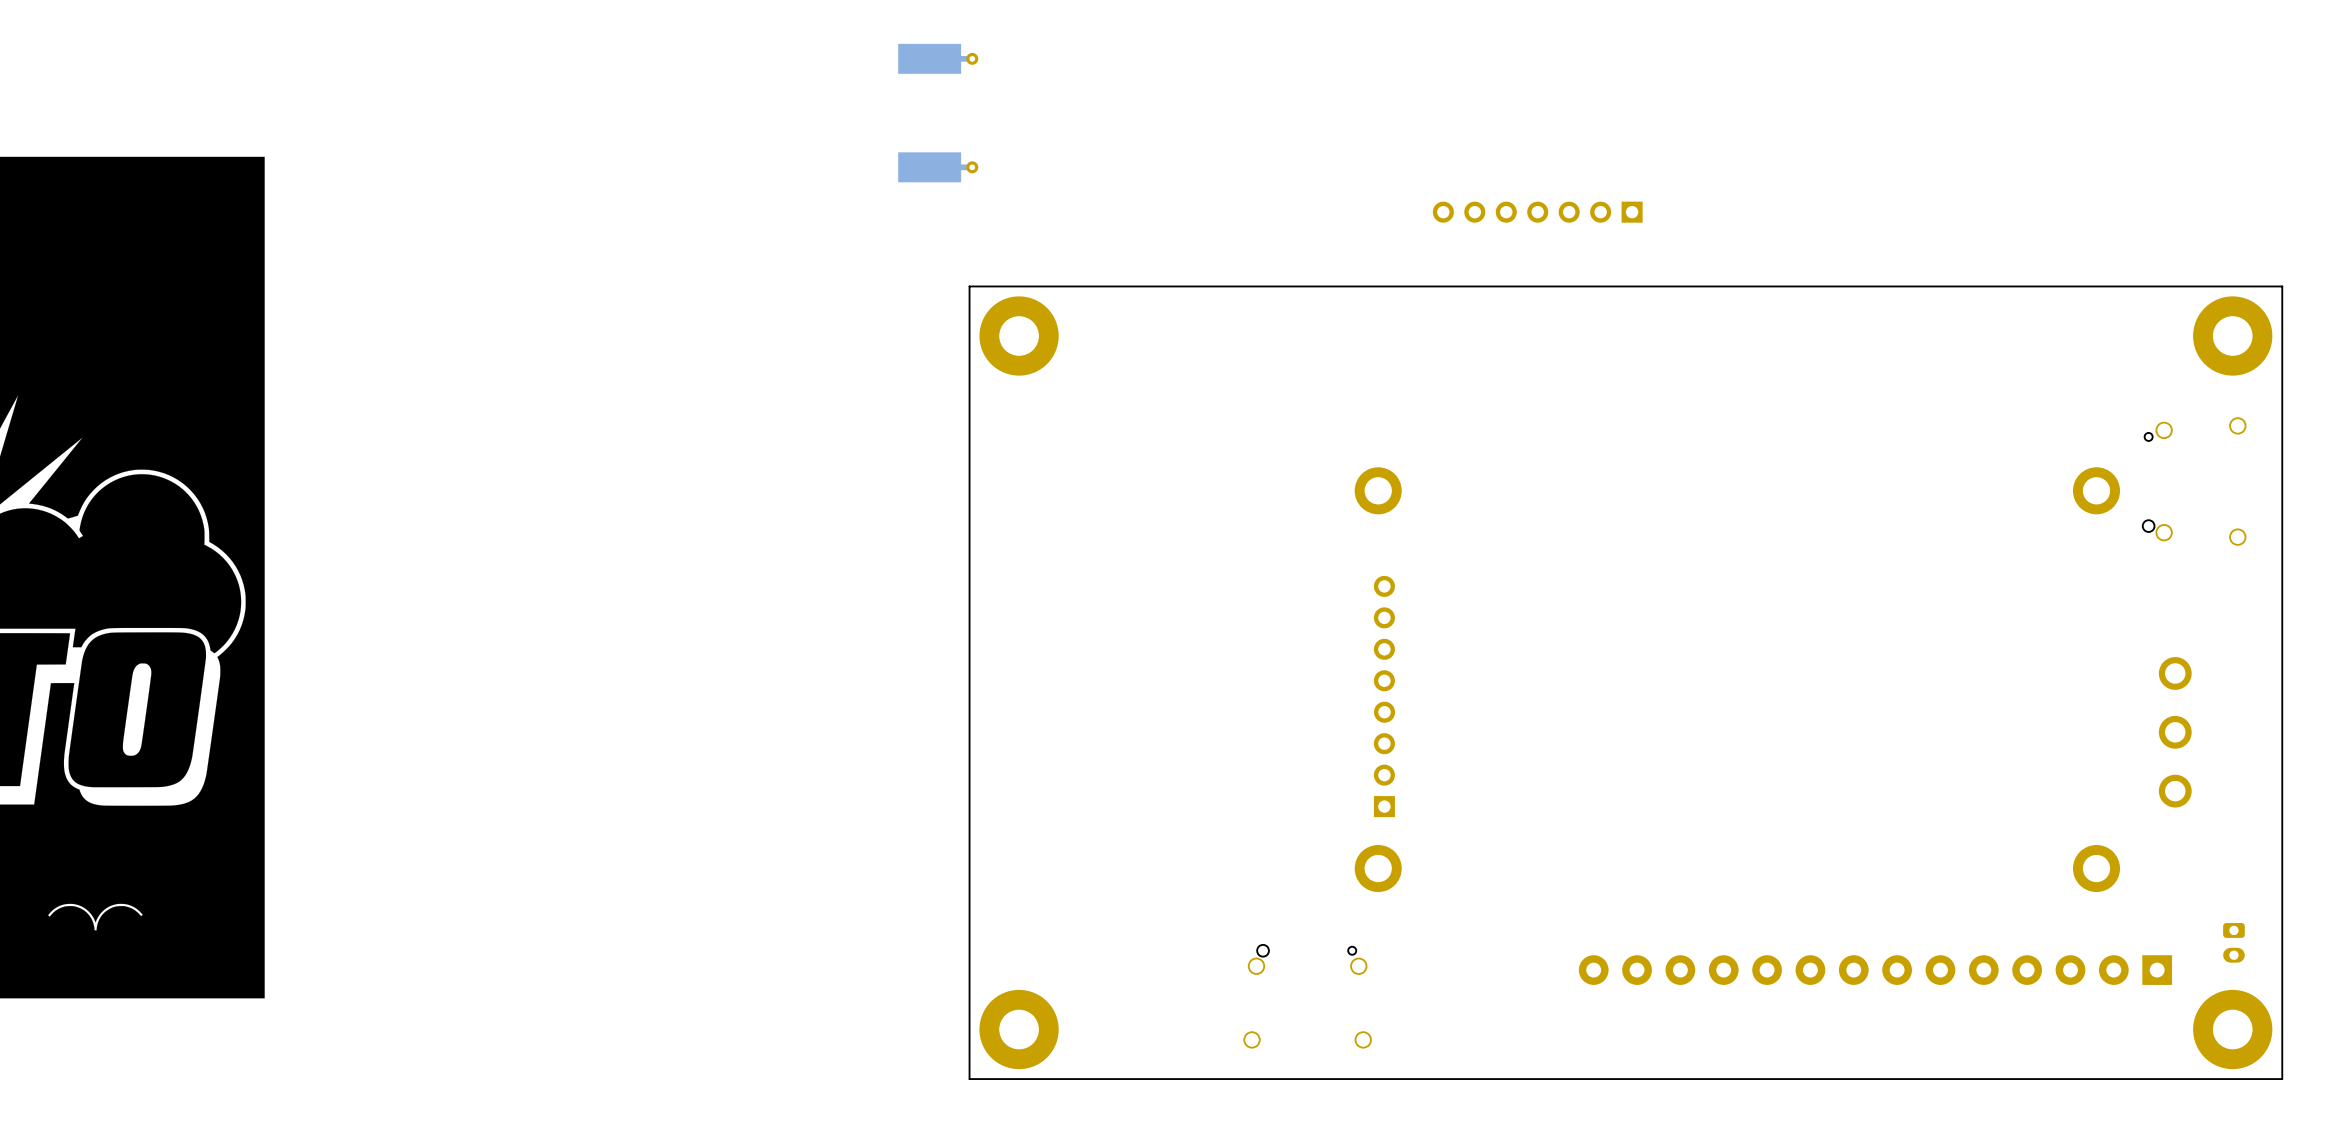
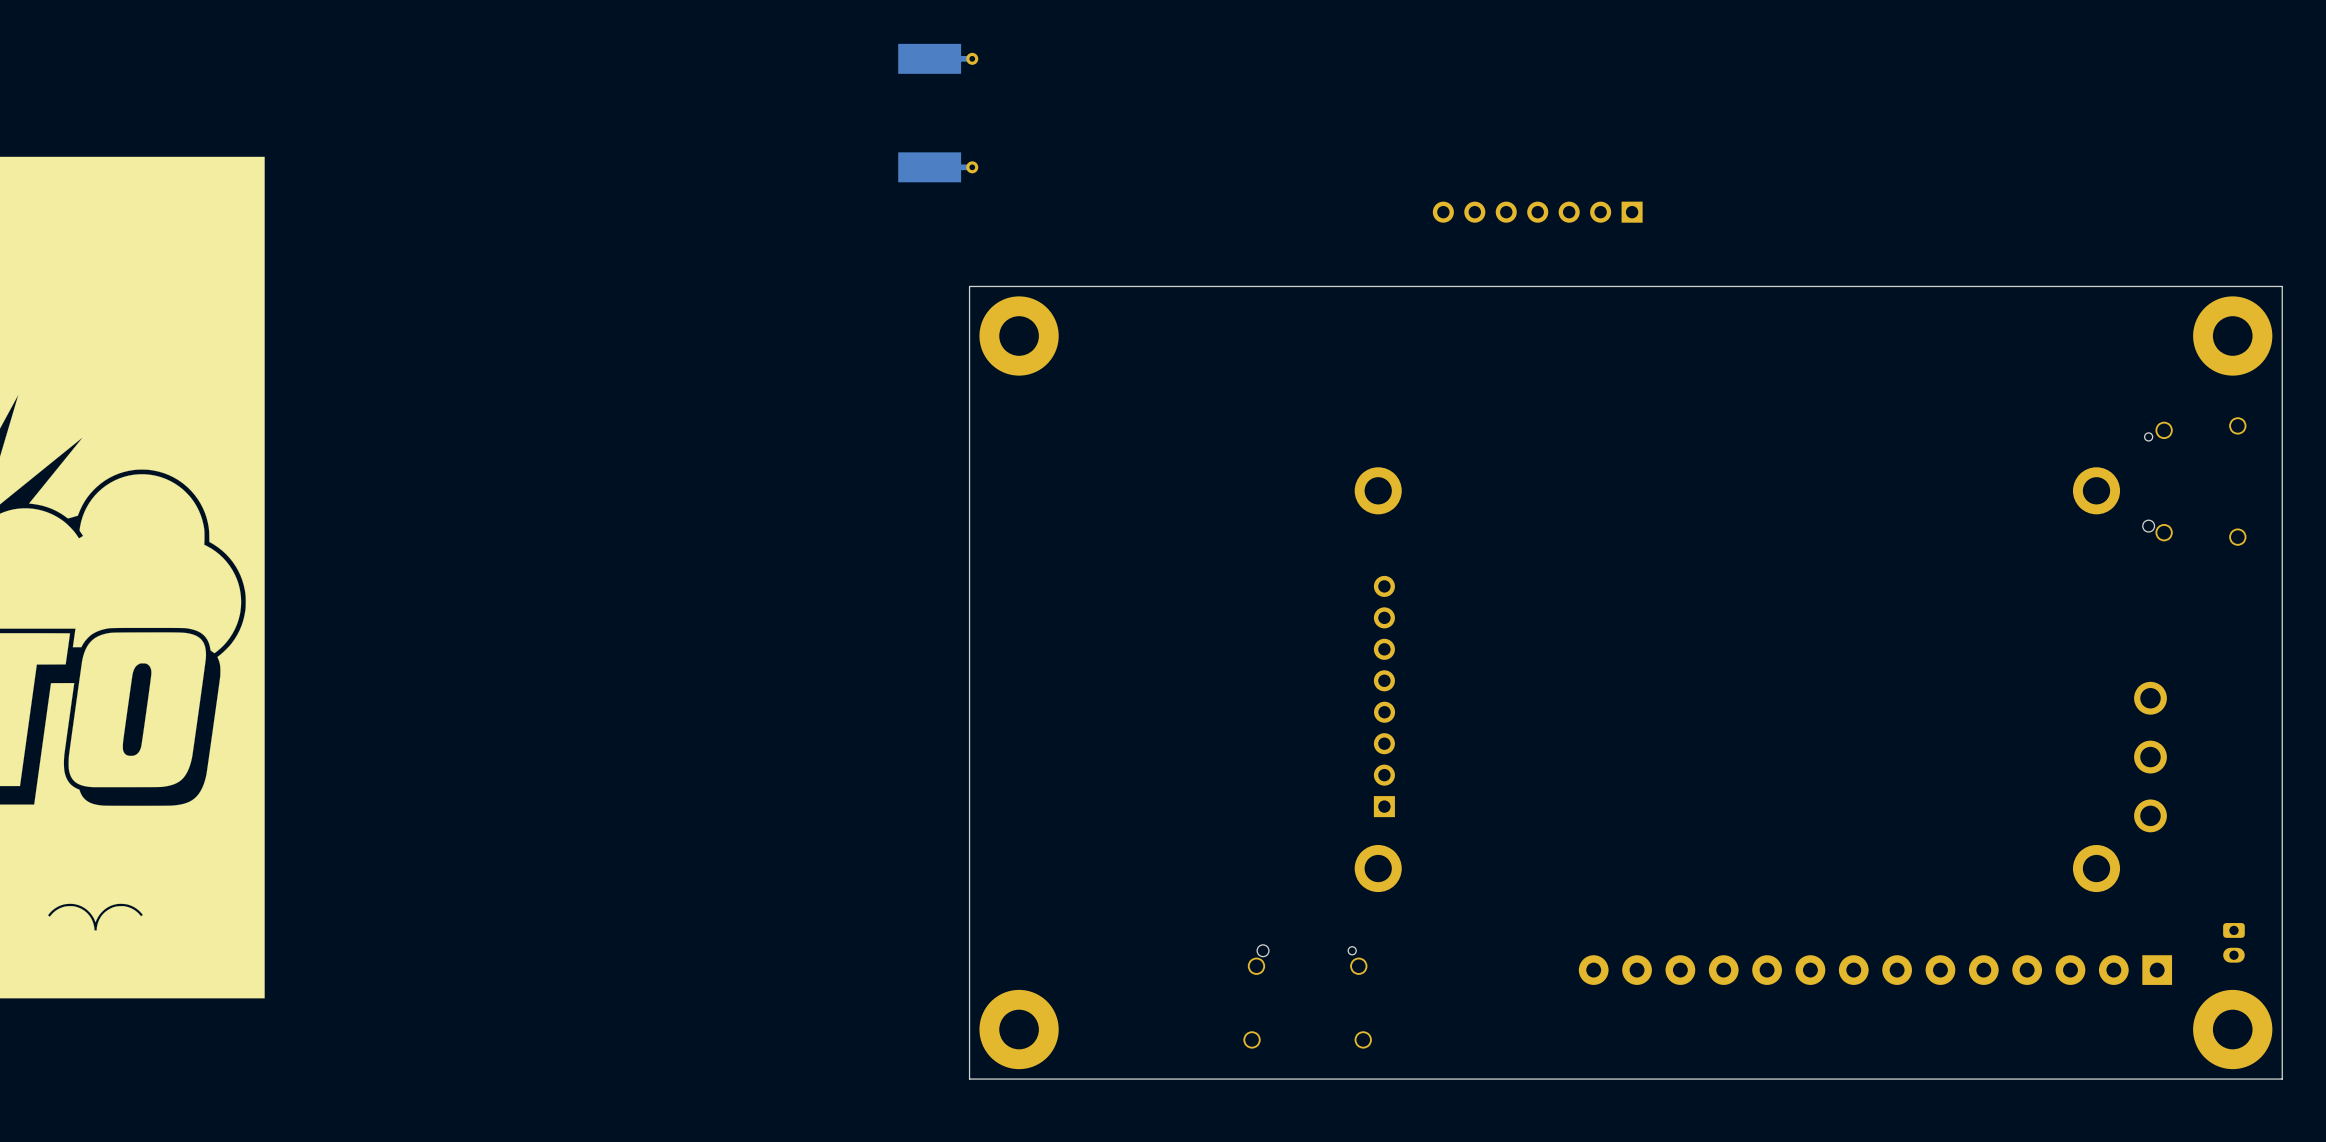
part position: (2175, 732) -> (2150, 757)

